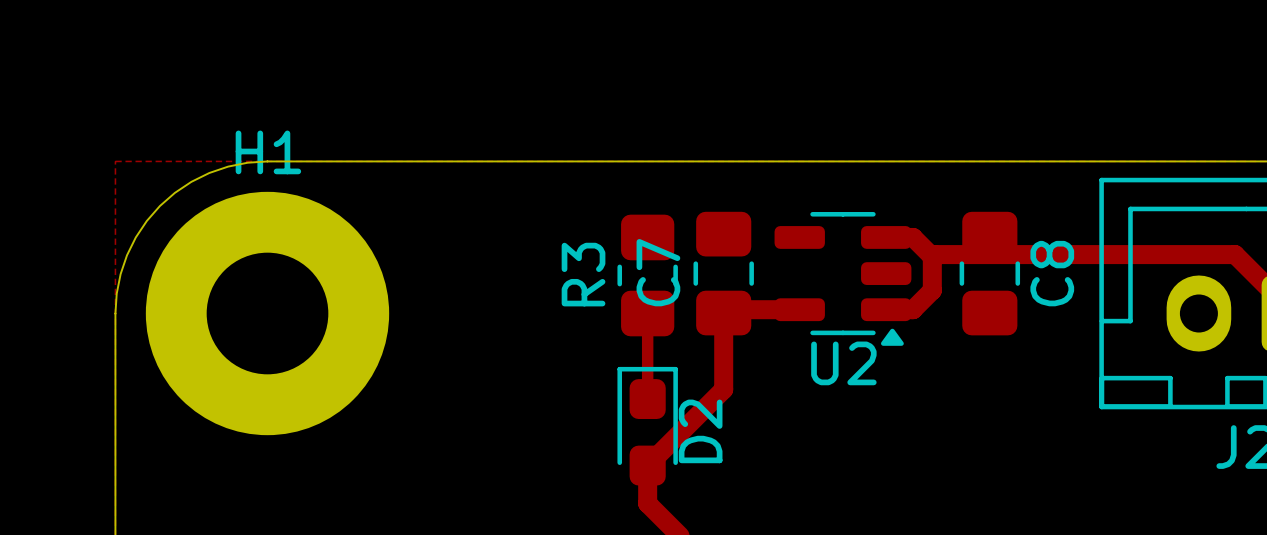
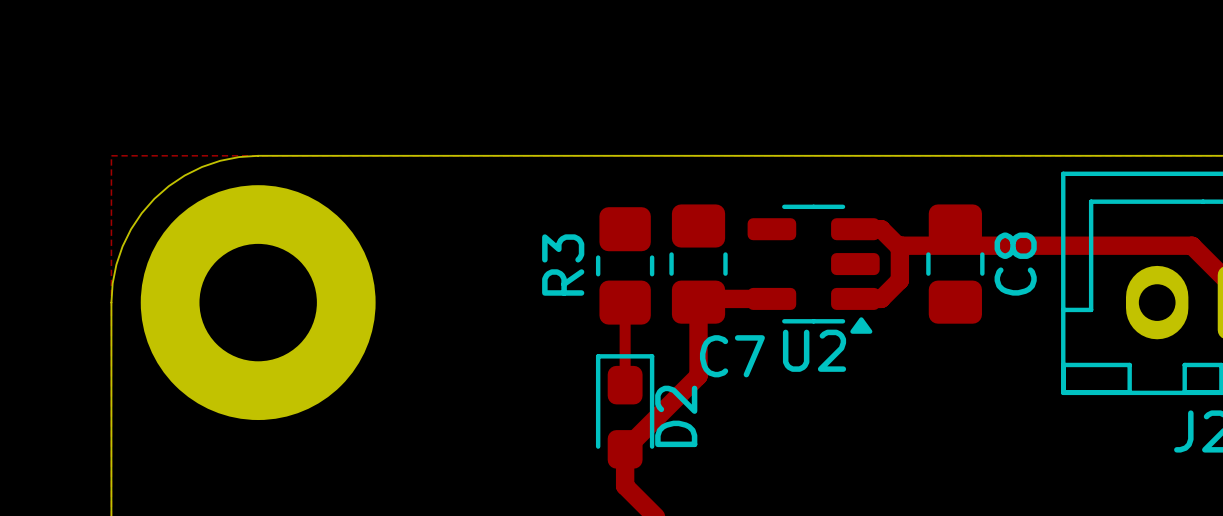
H1 name: H1 (268, 152) -> none
C7 name rotation: 0° (658, 272) -> 90° clockwise (732, 356)
C7 name position: C7 (658, 272) -> C7 (732, 356)

